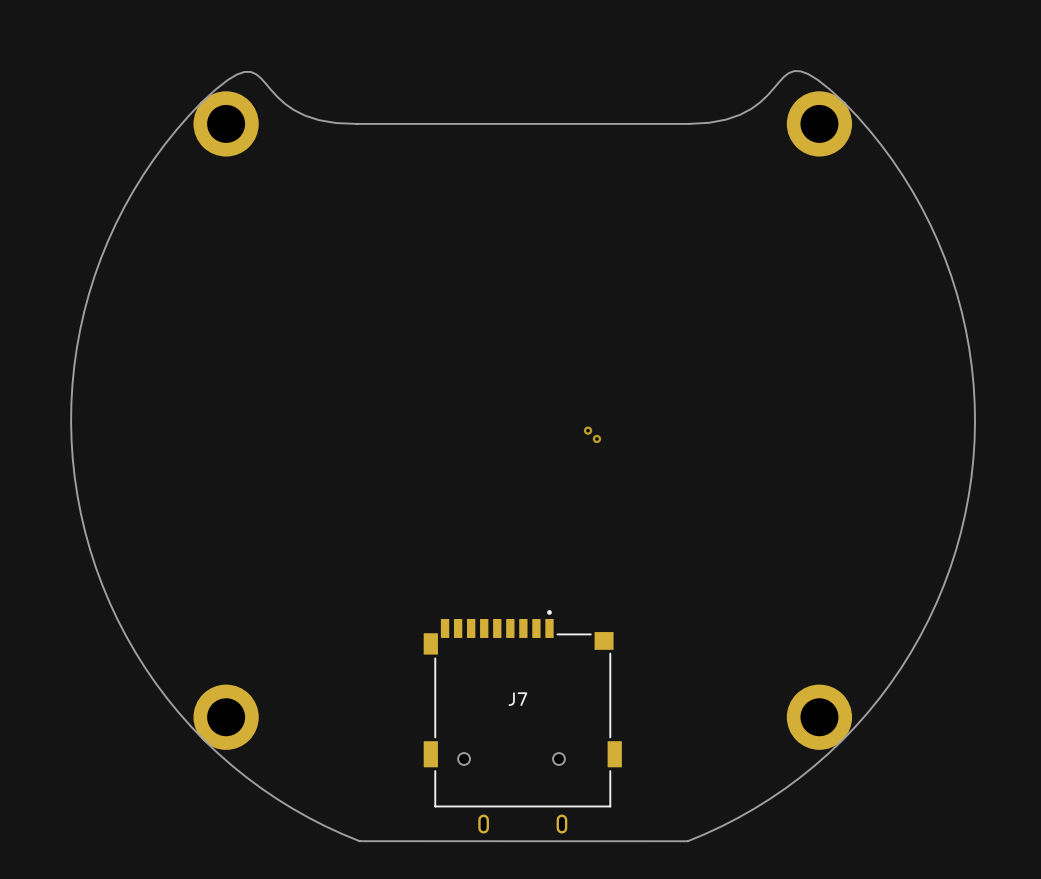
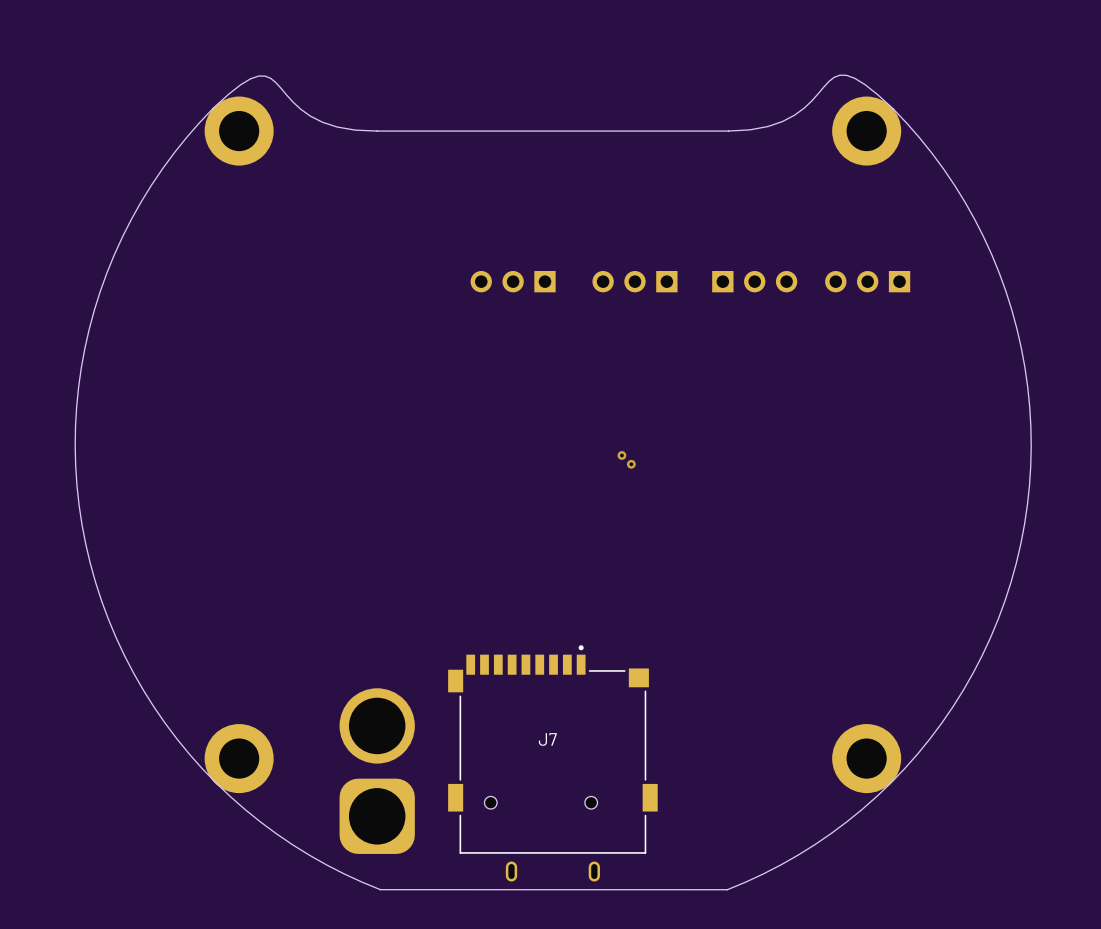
part: none -> (513, 281)
part: none -> (634, 281)
part: none -> (754, 281)
part: none -> (867, 281)
part: none -> (377, 771)

